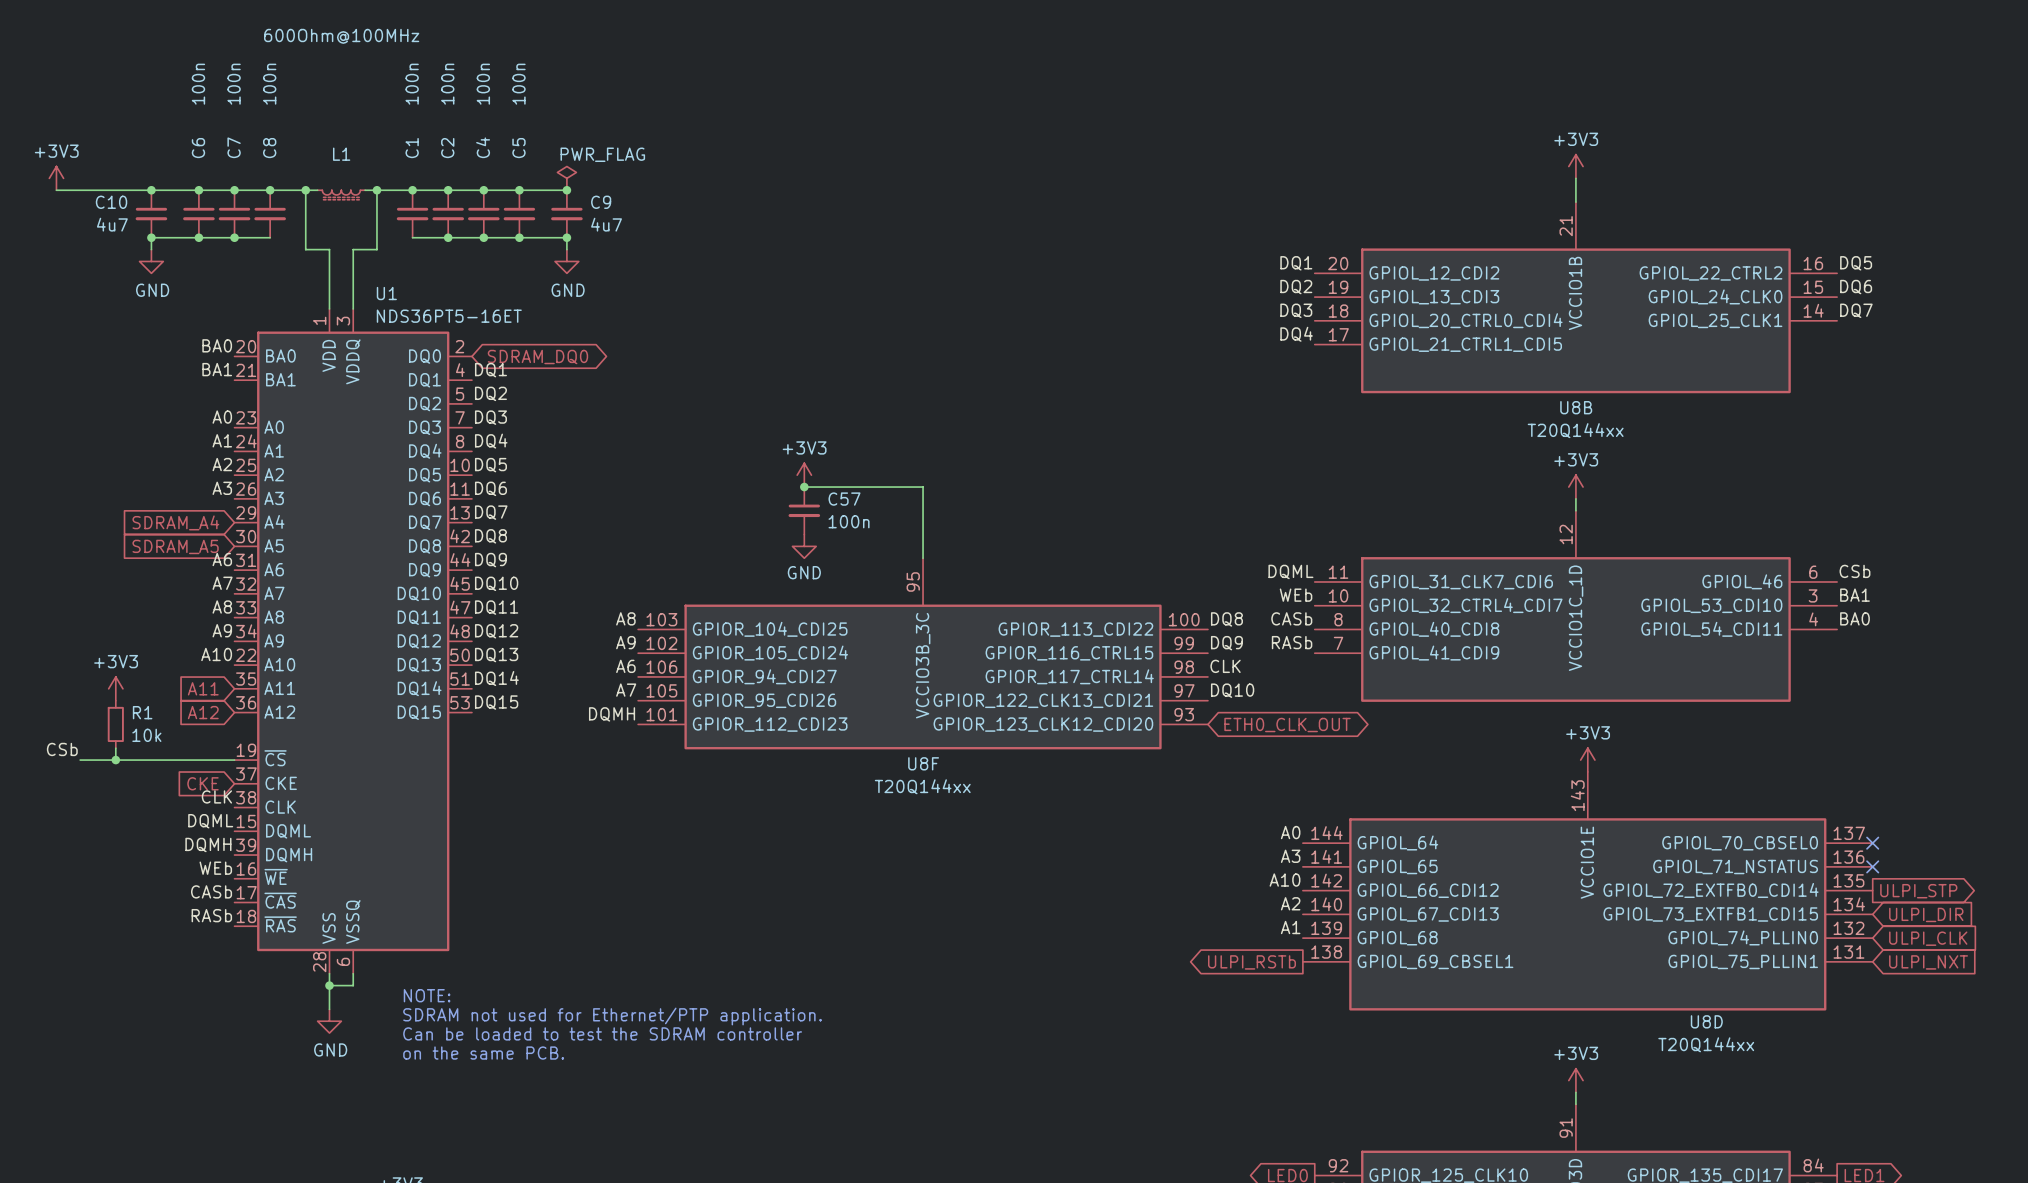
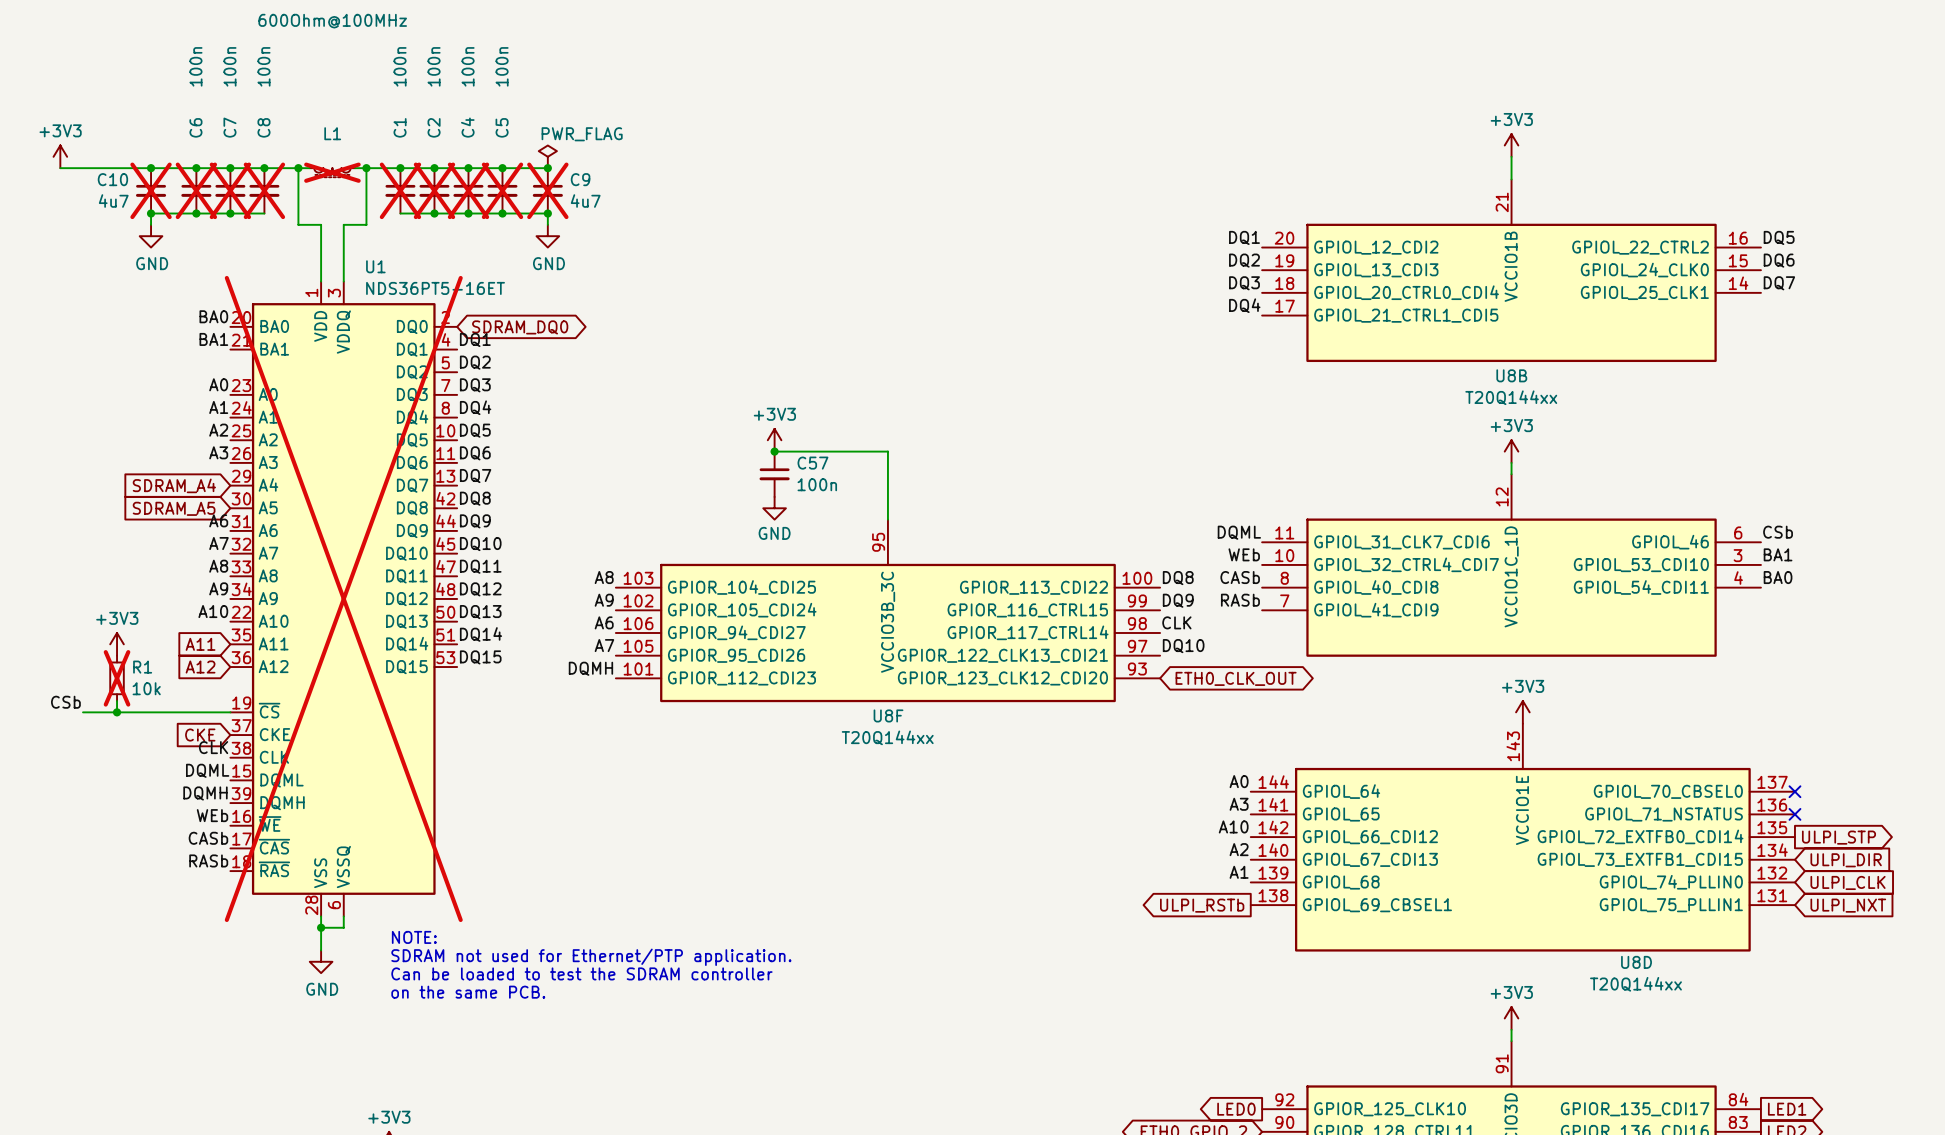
L1 do-not-place cross: none -> (332, 172)
C10 do-not-place cross: none -> (151, 190)
C6 do-not-place cross: none -> (196, 190)
C7 do-not-place cross: none -> (230, 190)
C8 do-not-place cross: none -> (264, 190)
C1 do-not-place cross: none -> (400, 190)
C2 do-not-place cross: none -> (434, 190)
C4 do-not-place cross: none -> (468, 190)
C5 do-not-place cross: none -> (502, 190)
C9 do-not-place cross: none -> (547, 190)
U1 do-not-place cross: none -> (343, 598)
R1 do-not-place cross: none -> (117, 678)

